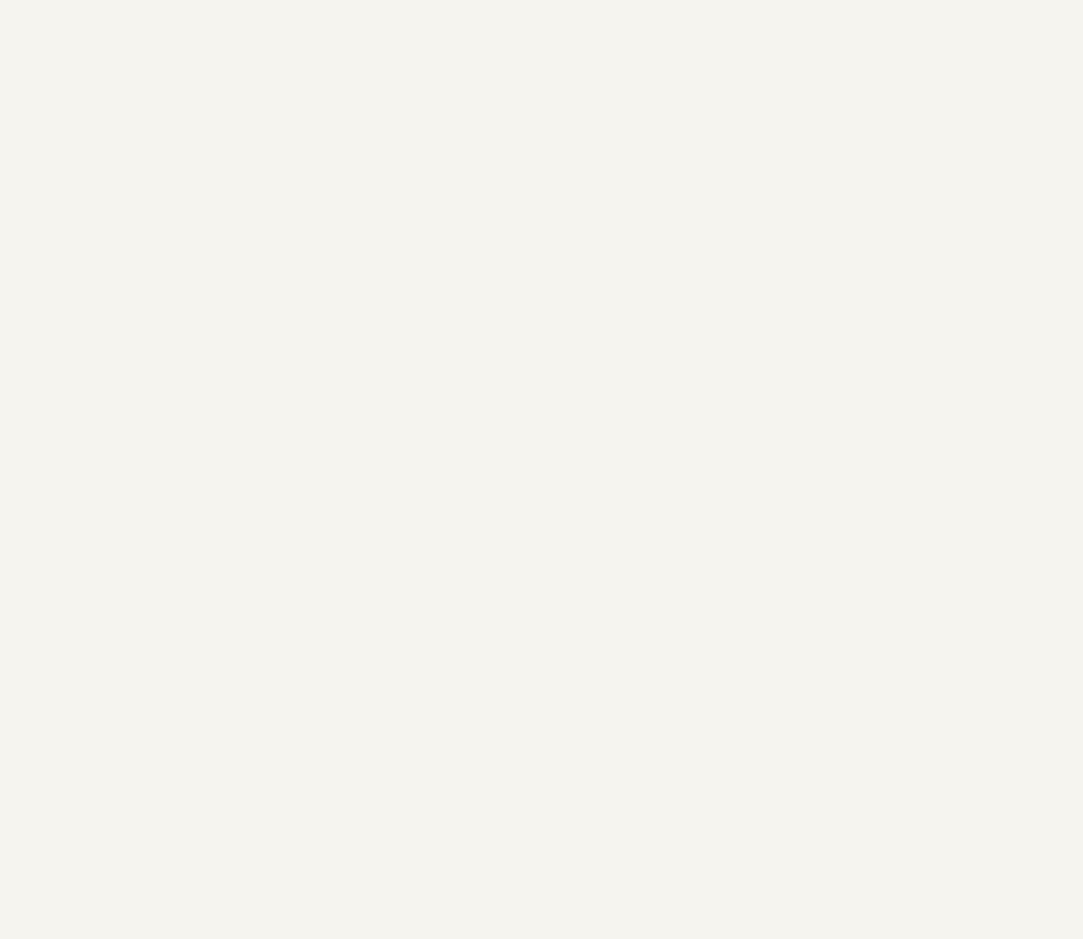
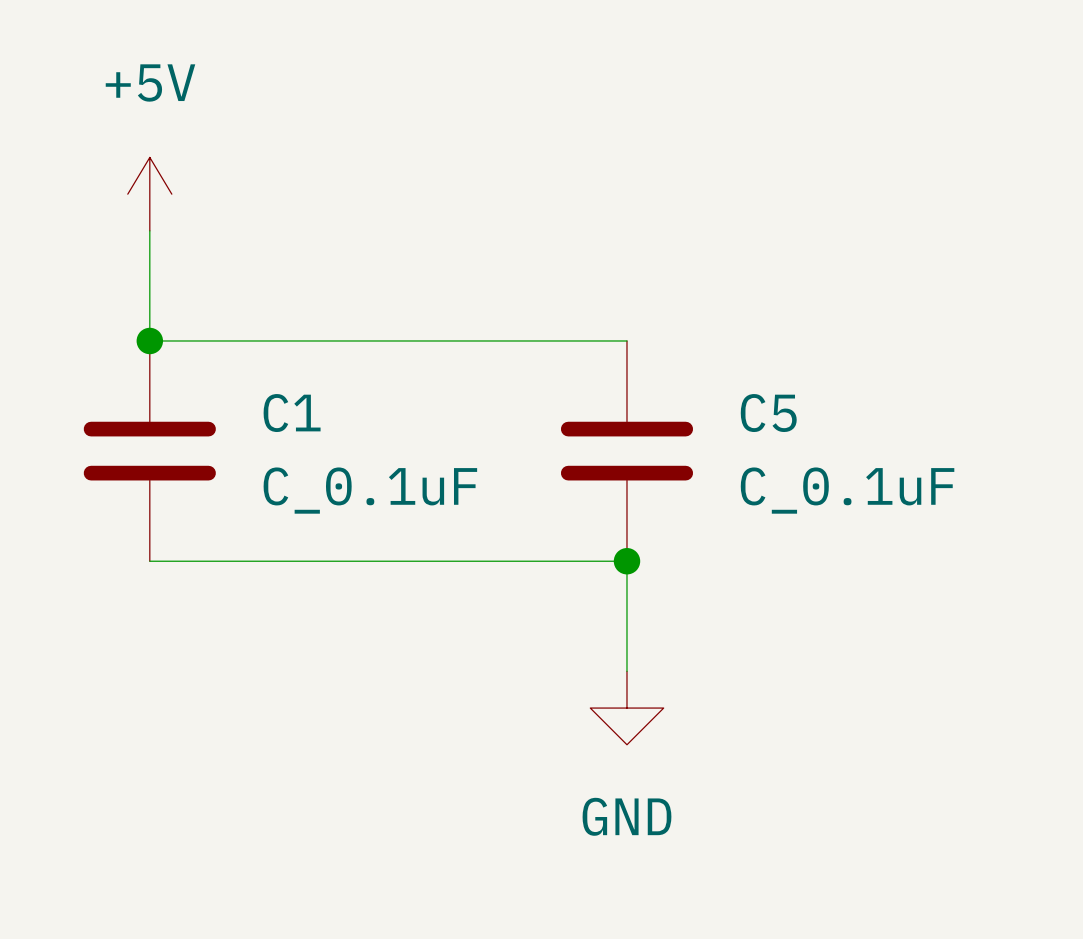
power symbol: none -> +5V (149, 194)
wire: none -> (149, 230) (149, 340) (626, 340)
junction: none -> (149, 340)
C1: none -> C_0.1uF (149, 451)
C5: none -> C_0.1uF (626, 451)
wire: none -> (149, 561) (626, 561) (626, 671)
junction: none -> (626, 561)
power symbol: none -> GND (626, 708)

